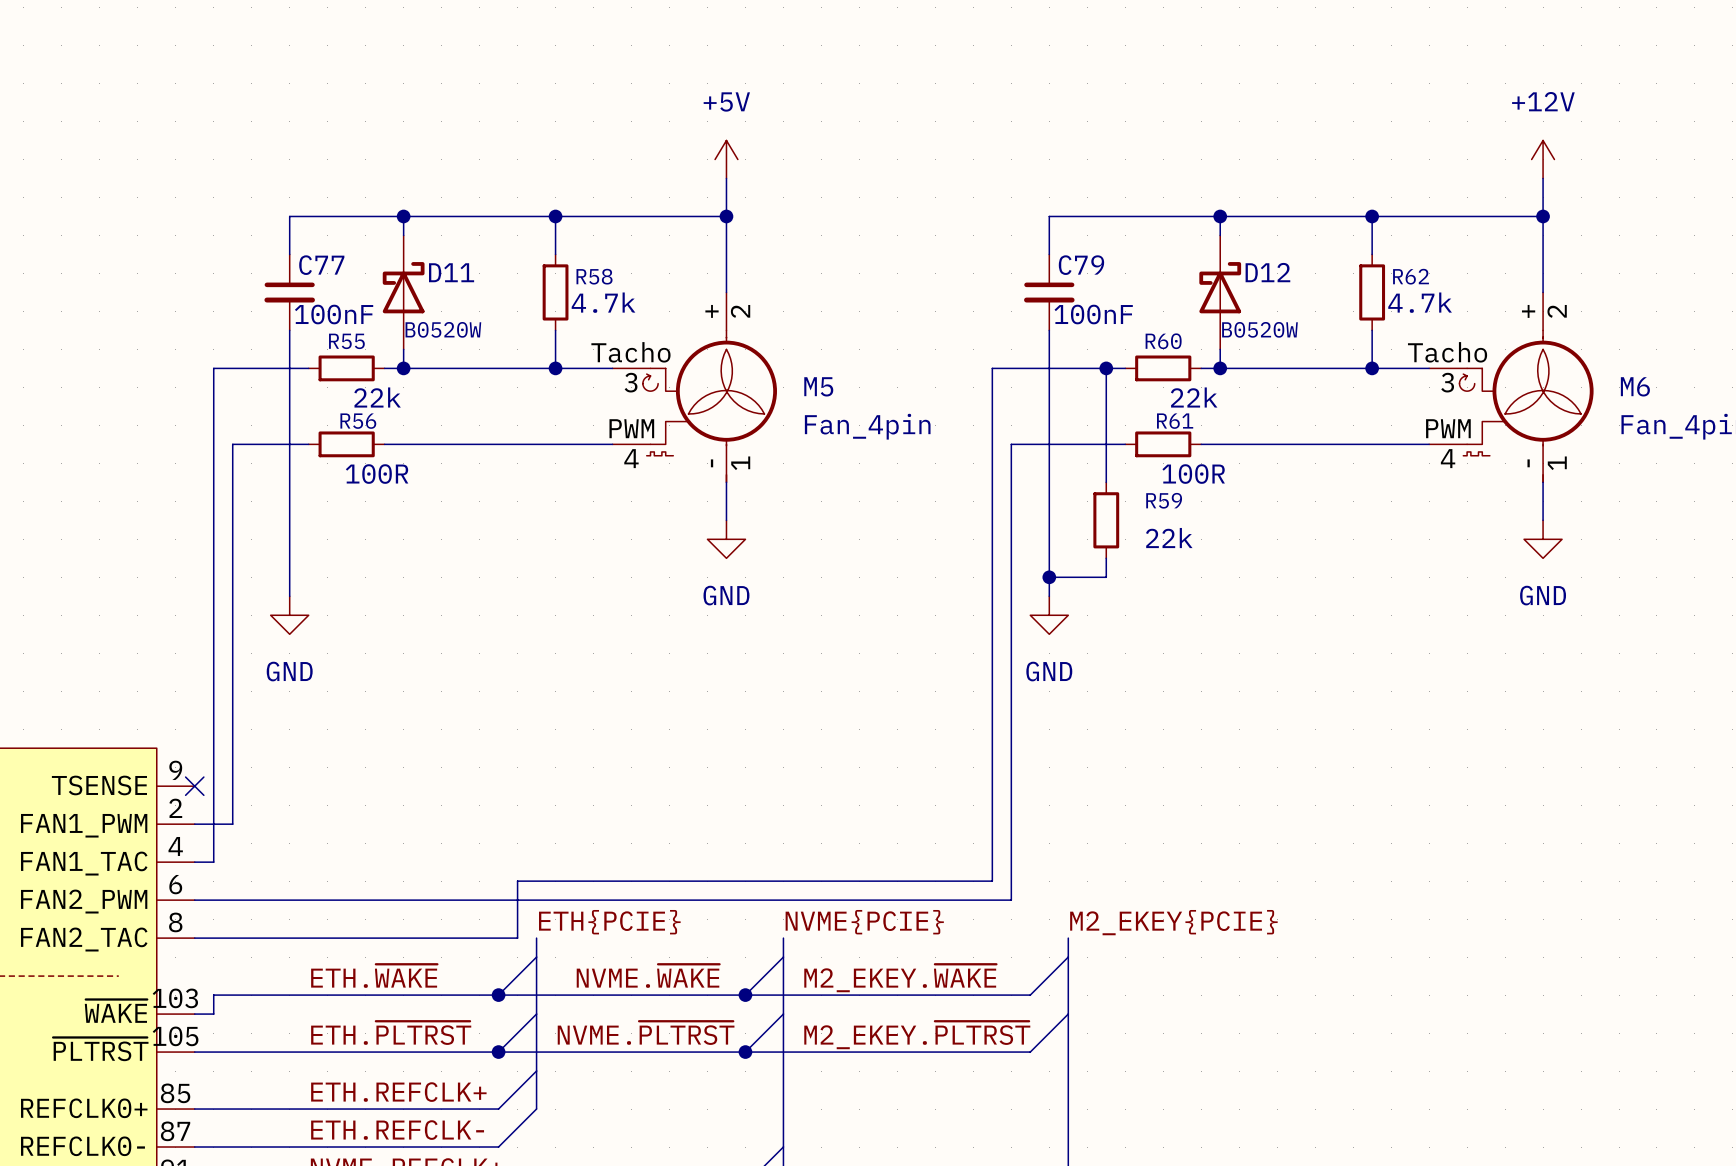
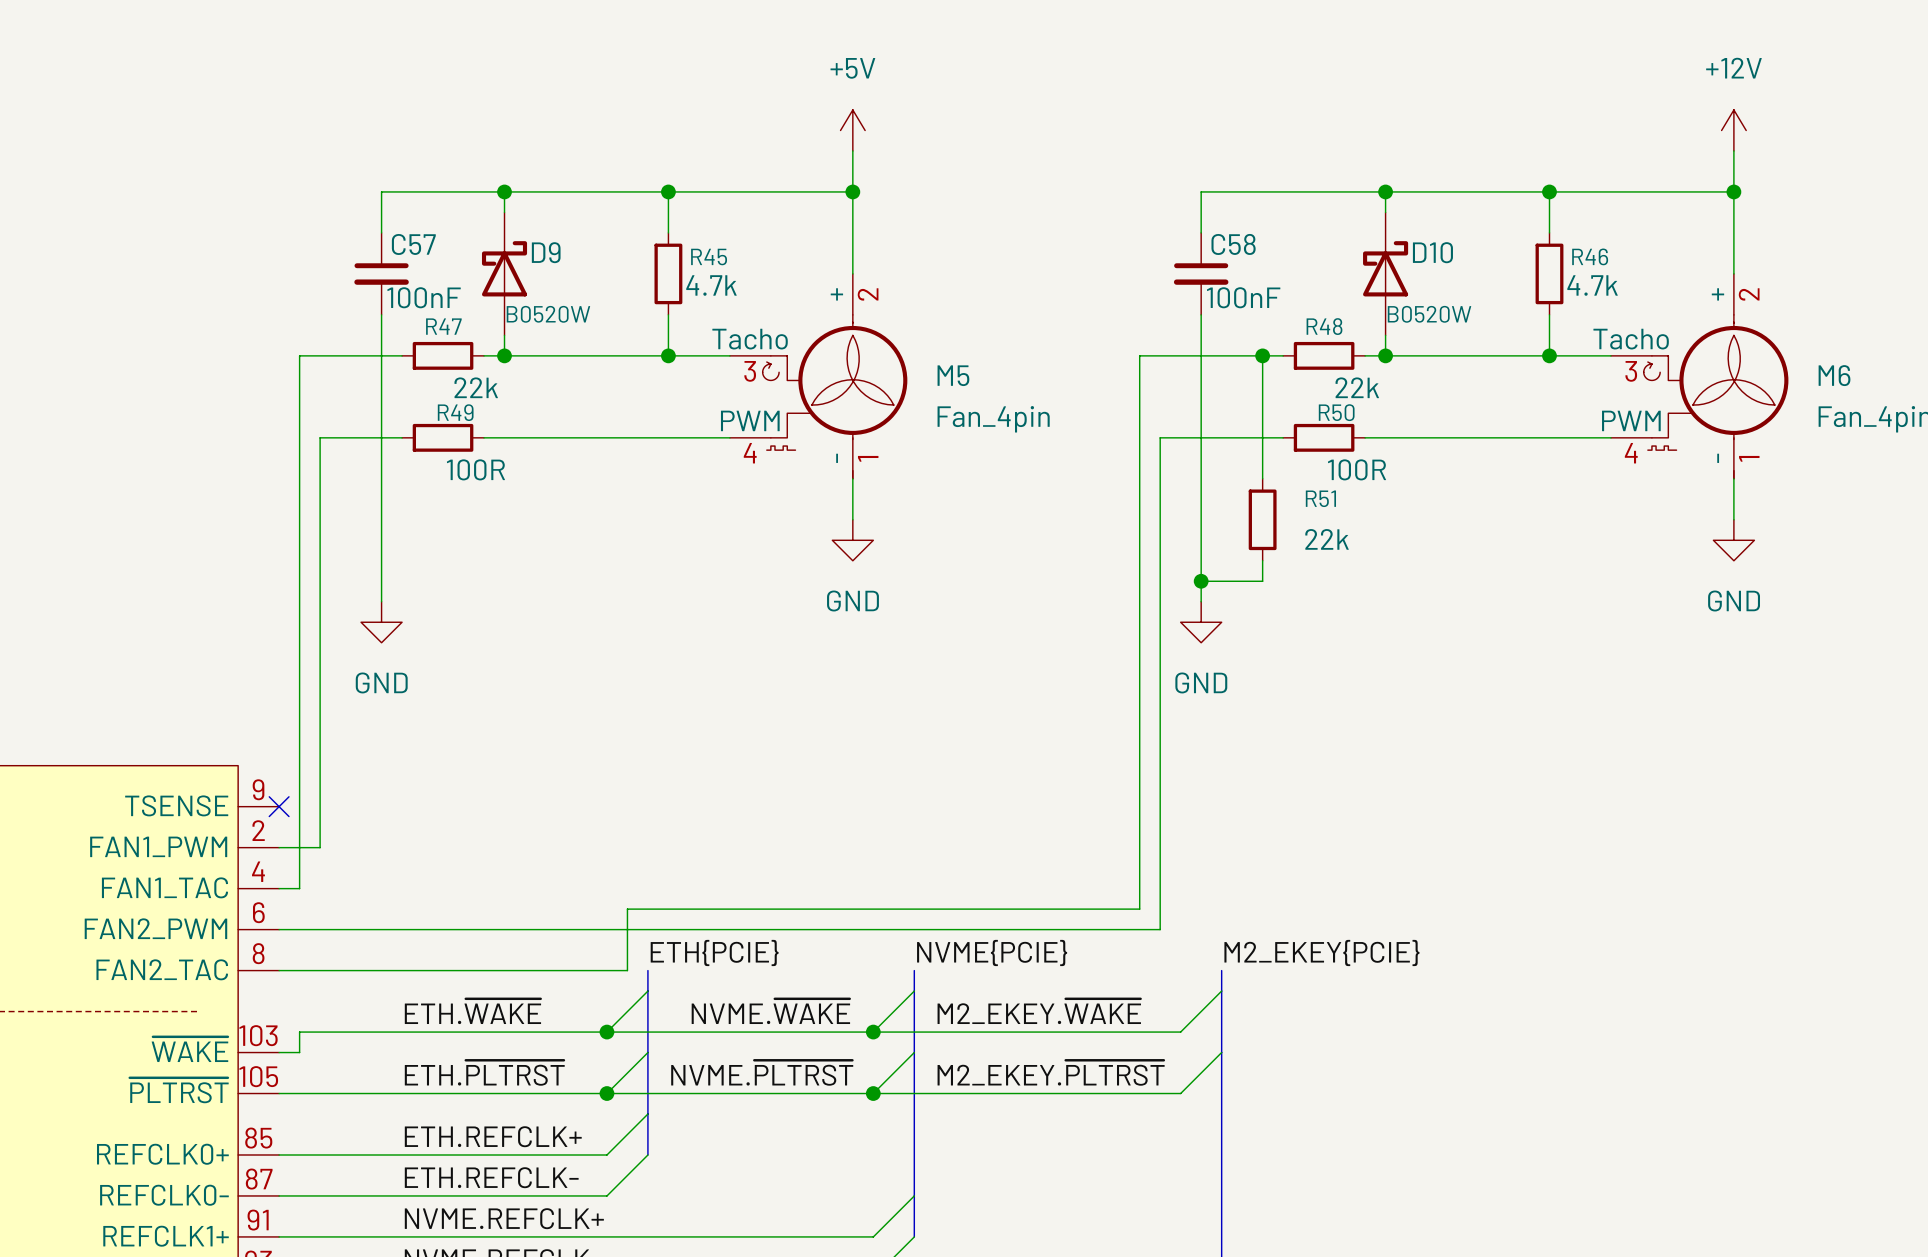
C77 name: C77 (321, 265) -> C57 (413, 244)
C79 name: C79 (1081, 265) -> C58 (1233, 244)
D11 name: D11 (451, 272) -> D9 (546, 252)
D12 name: D12 (1267, 272) -> D10 (1432, 252)
R58 name: R58 (594, 276) -> R45 (709, 257)
R62 name: R62 (1411, 276) -> R46 (1590, 256)
R55 name: R55 (346, 341) -> R47 (443, 326)
R60 name: R60 (1163, 341) -> R48 (1324, 326)
R56 name: R56 (358, 421) -> R49 (455, 412)
R61 name: R61 (1175, 421) -> R50 (1336, 412)
R59 name: R59 (1164, 500) -> R51 (1320, 498)

